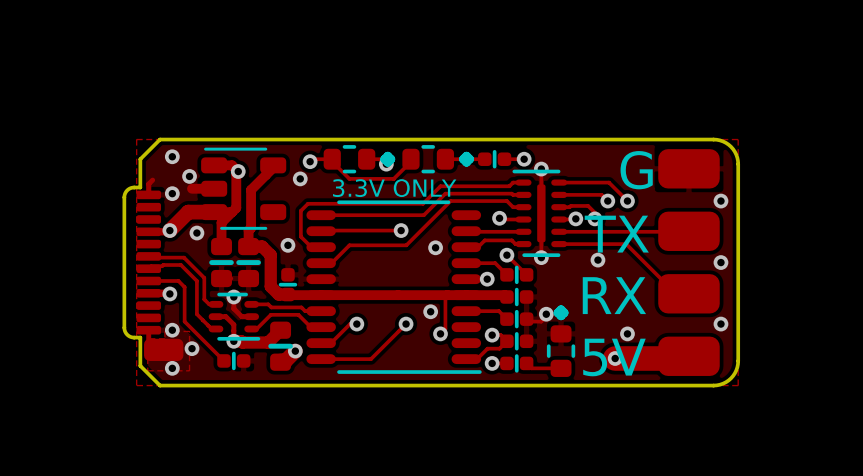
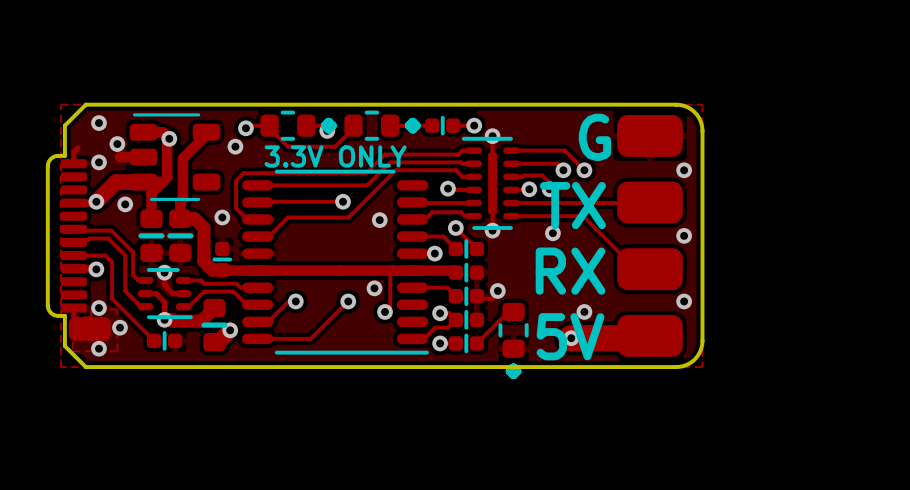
part rotation: 0° (561, 341) -> 180° (513, 340)
track: (526, 363) (531, 368) (561, 368) -> (476, 343) (508, 311)

